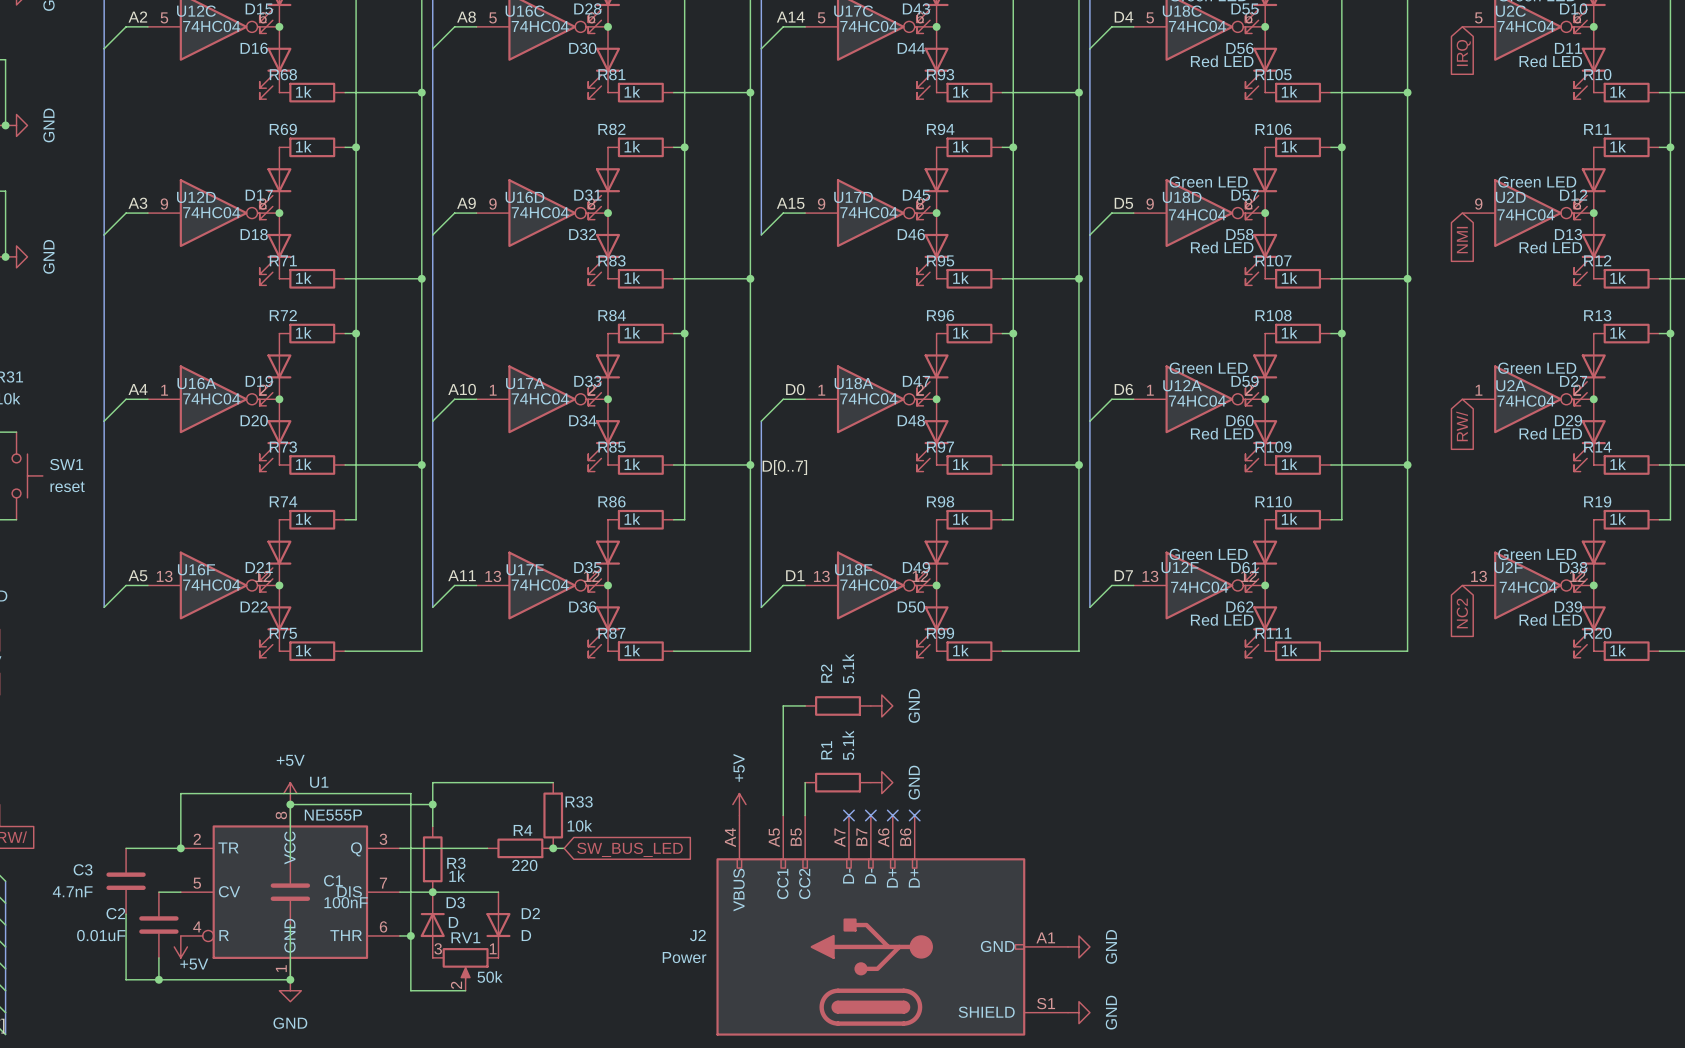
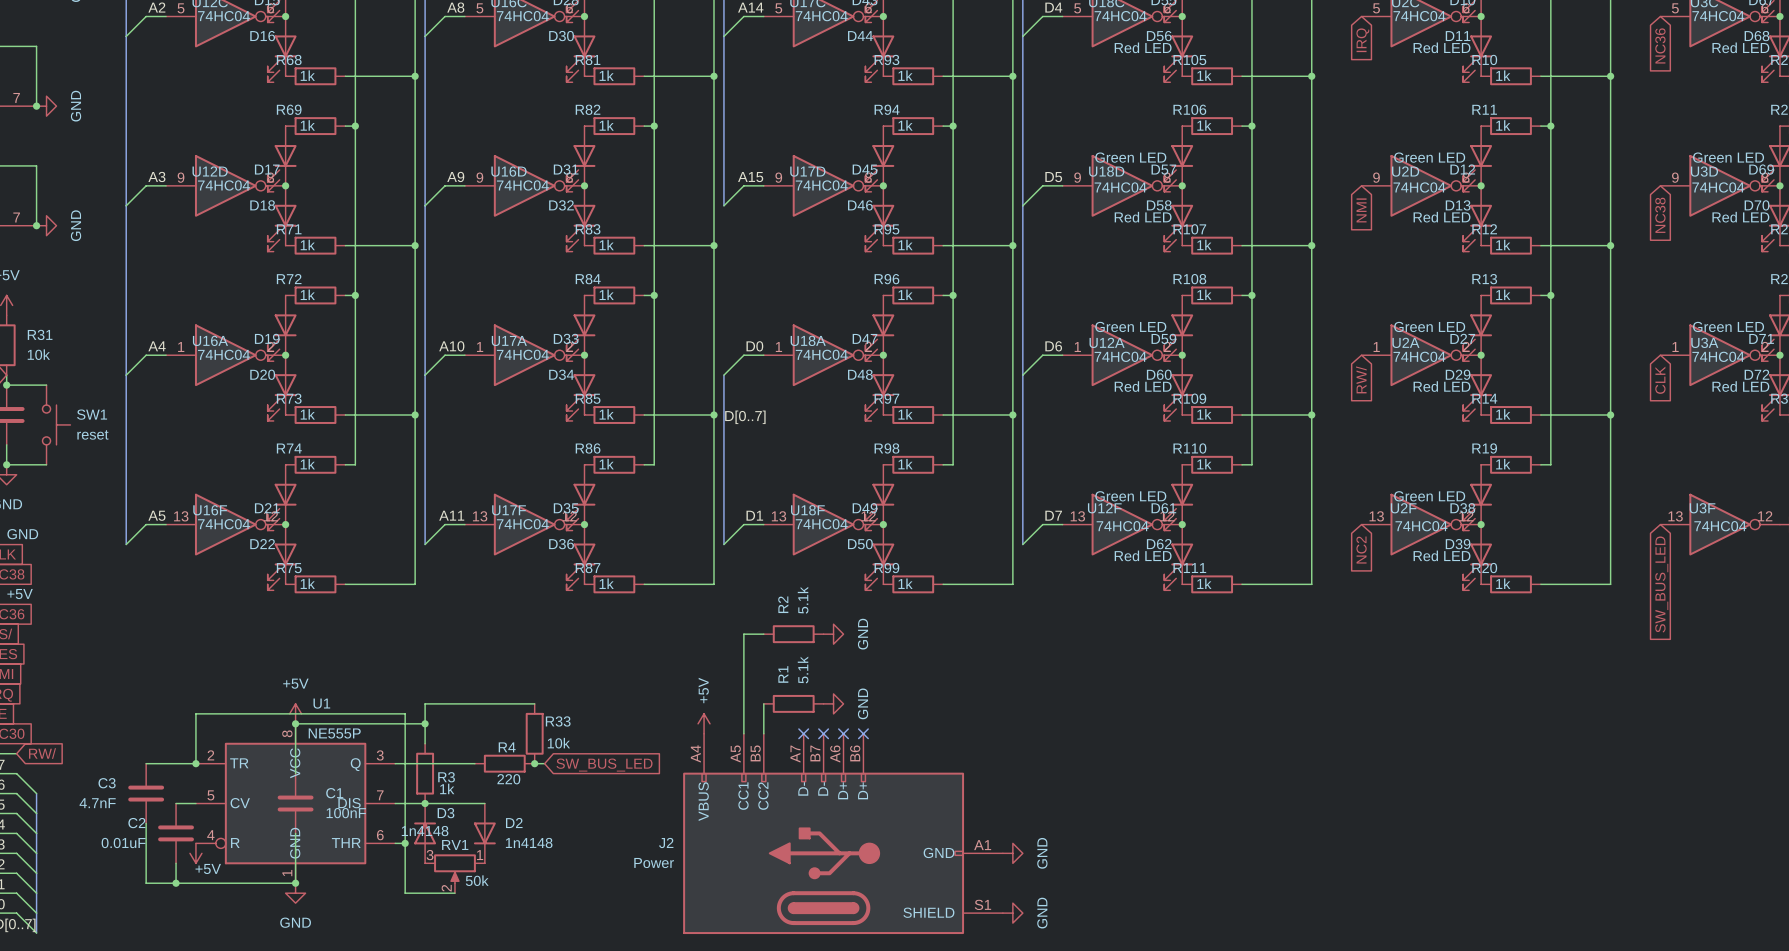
D3 value: D (453, 922) -> 1n4148 (425, 831)
D2 value: D (526, 935) -> 1n4148 (529, 843)

